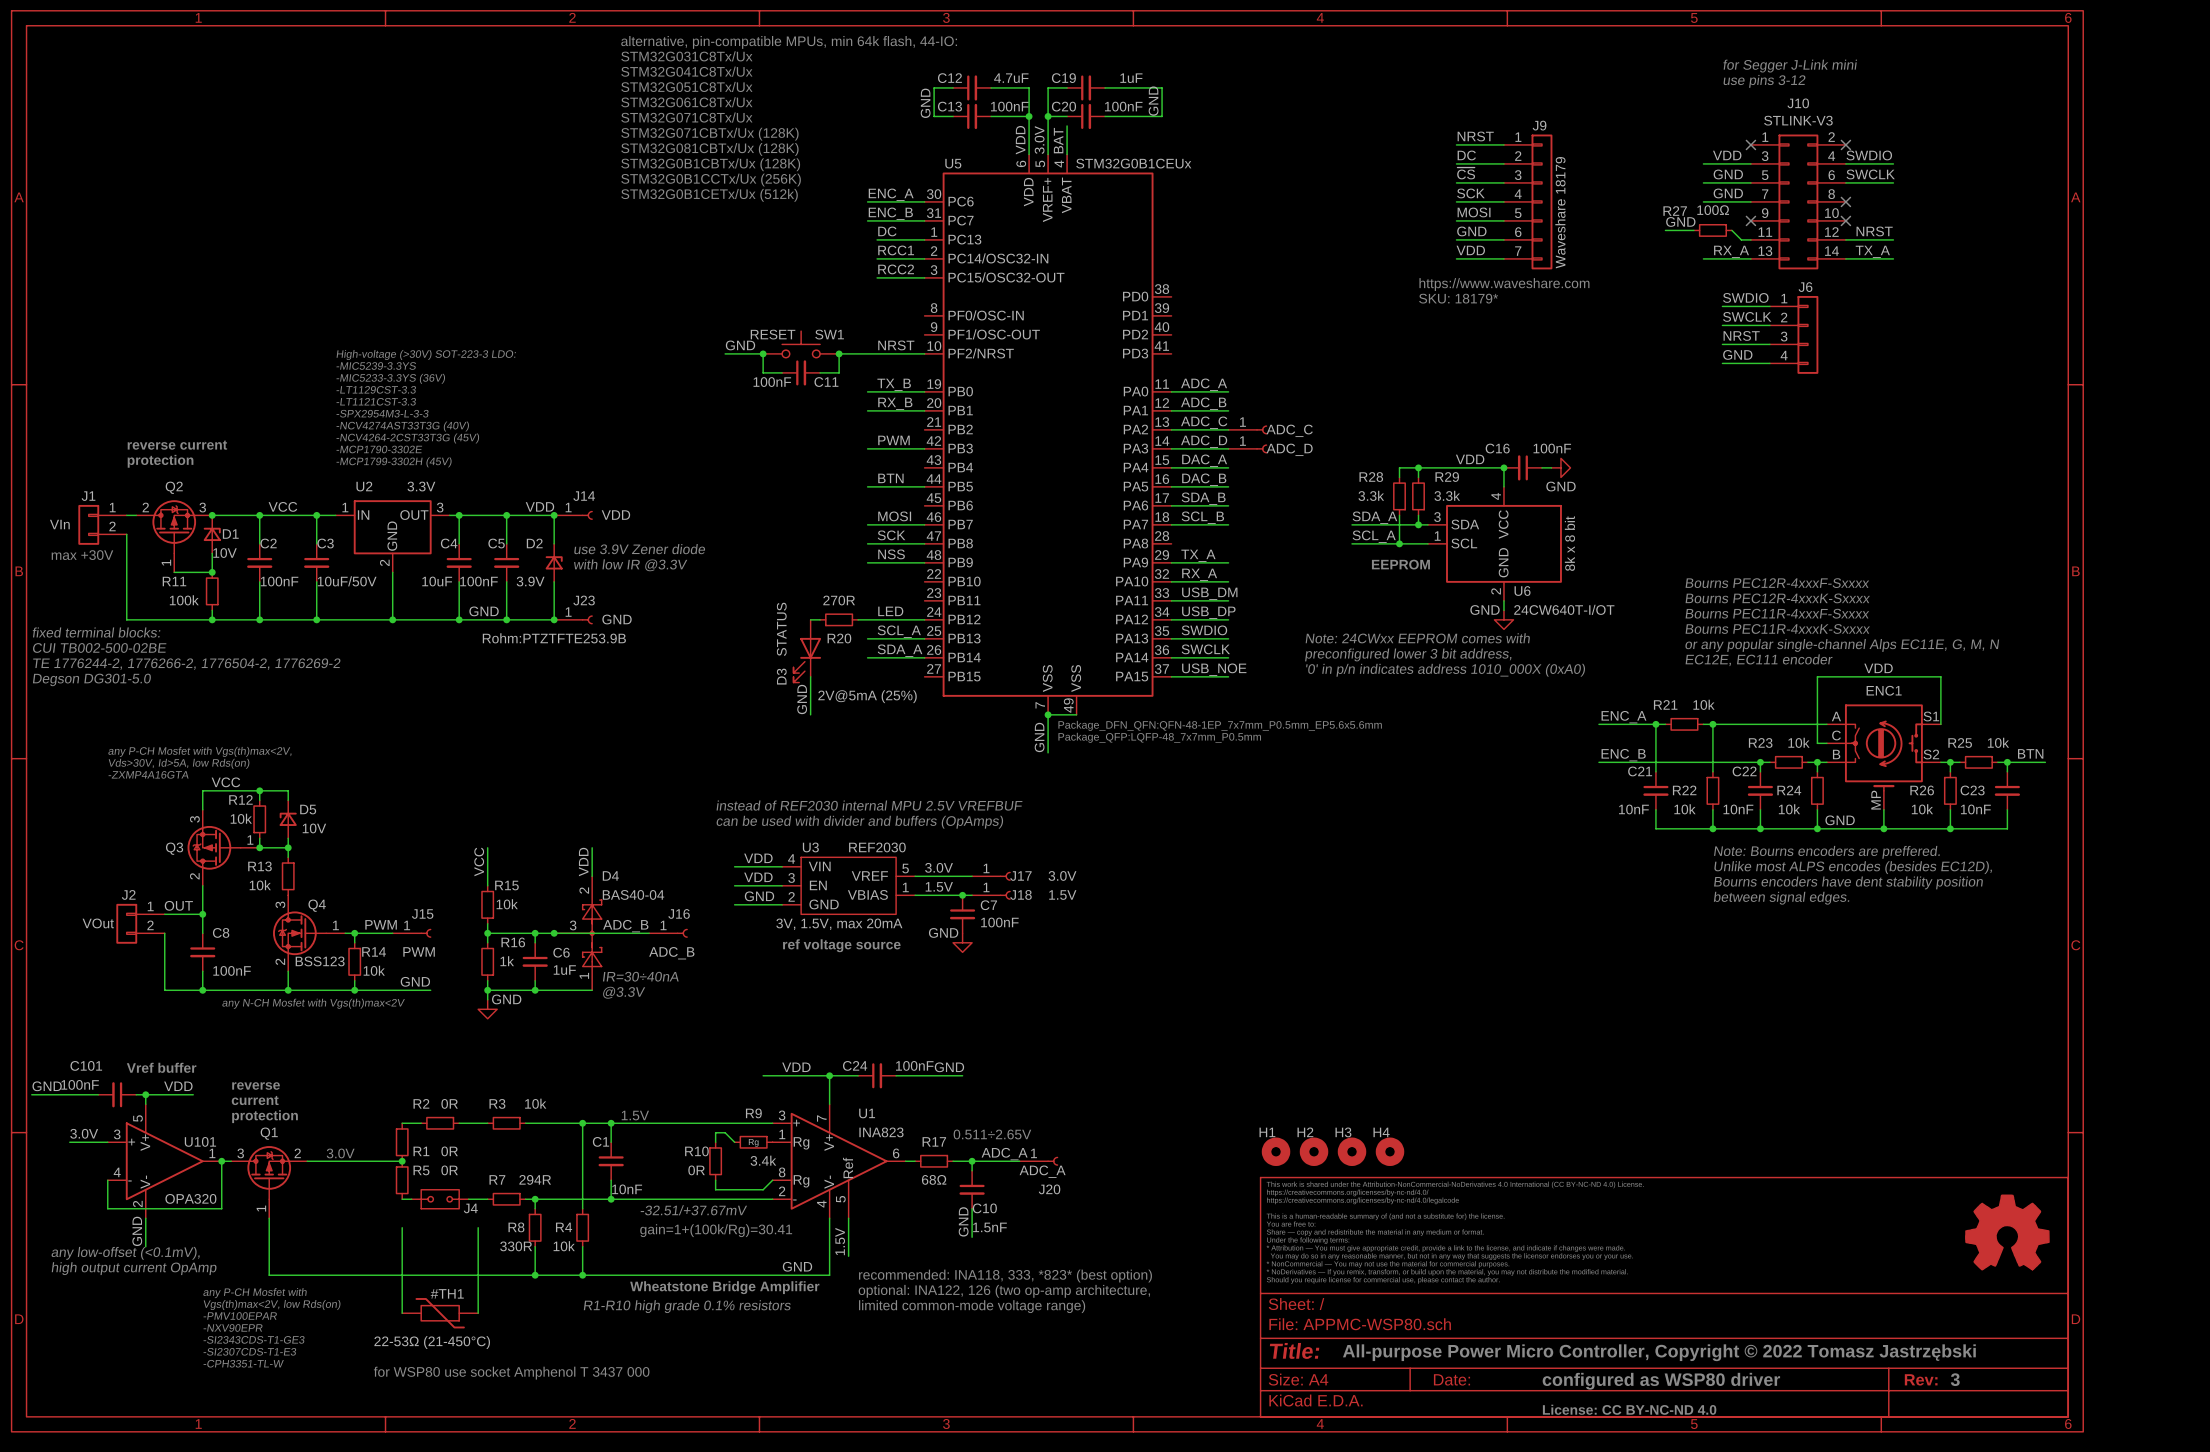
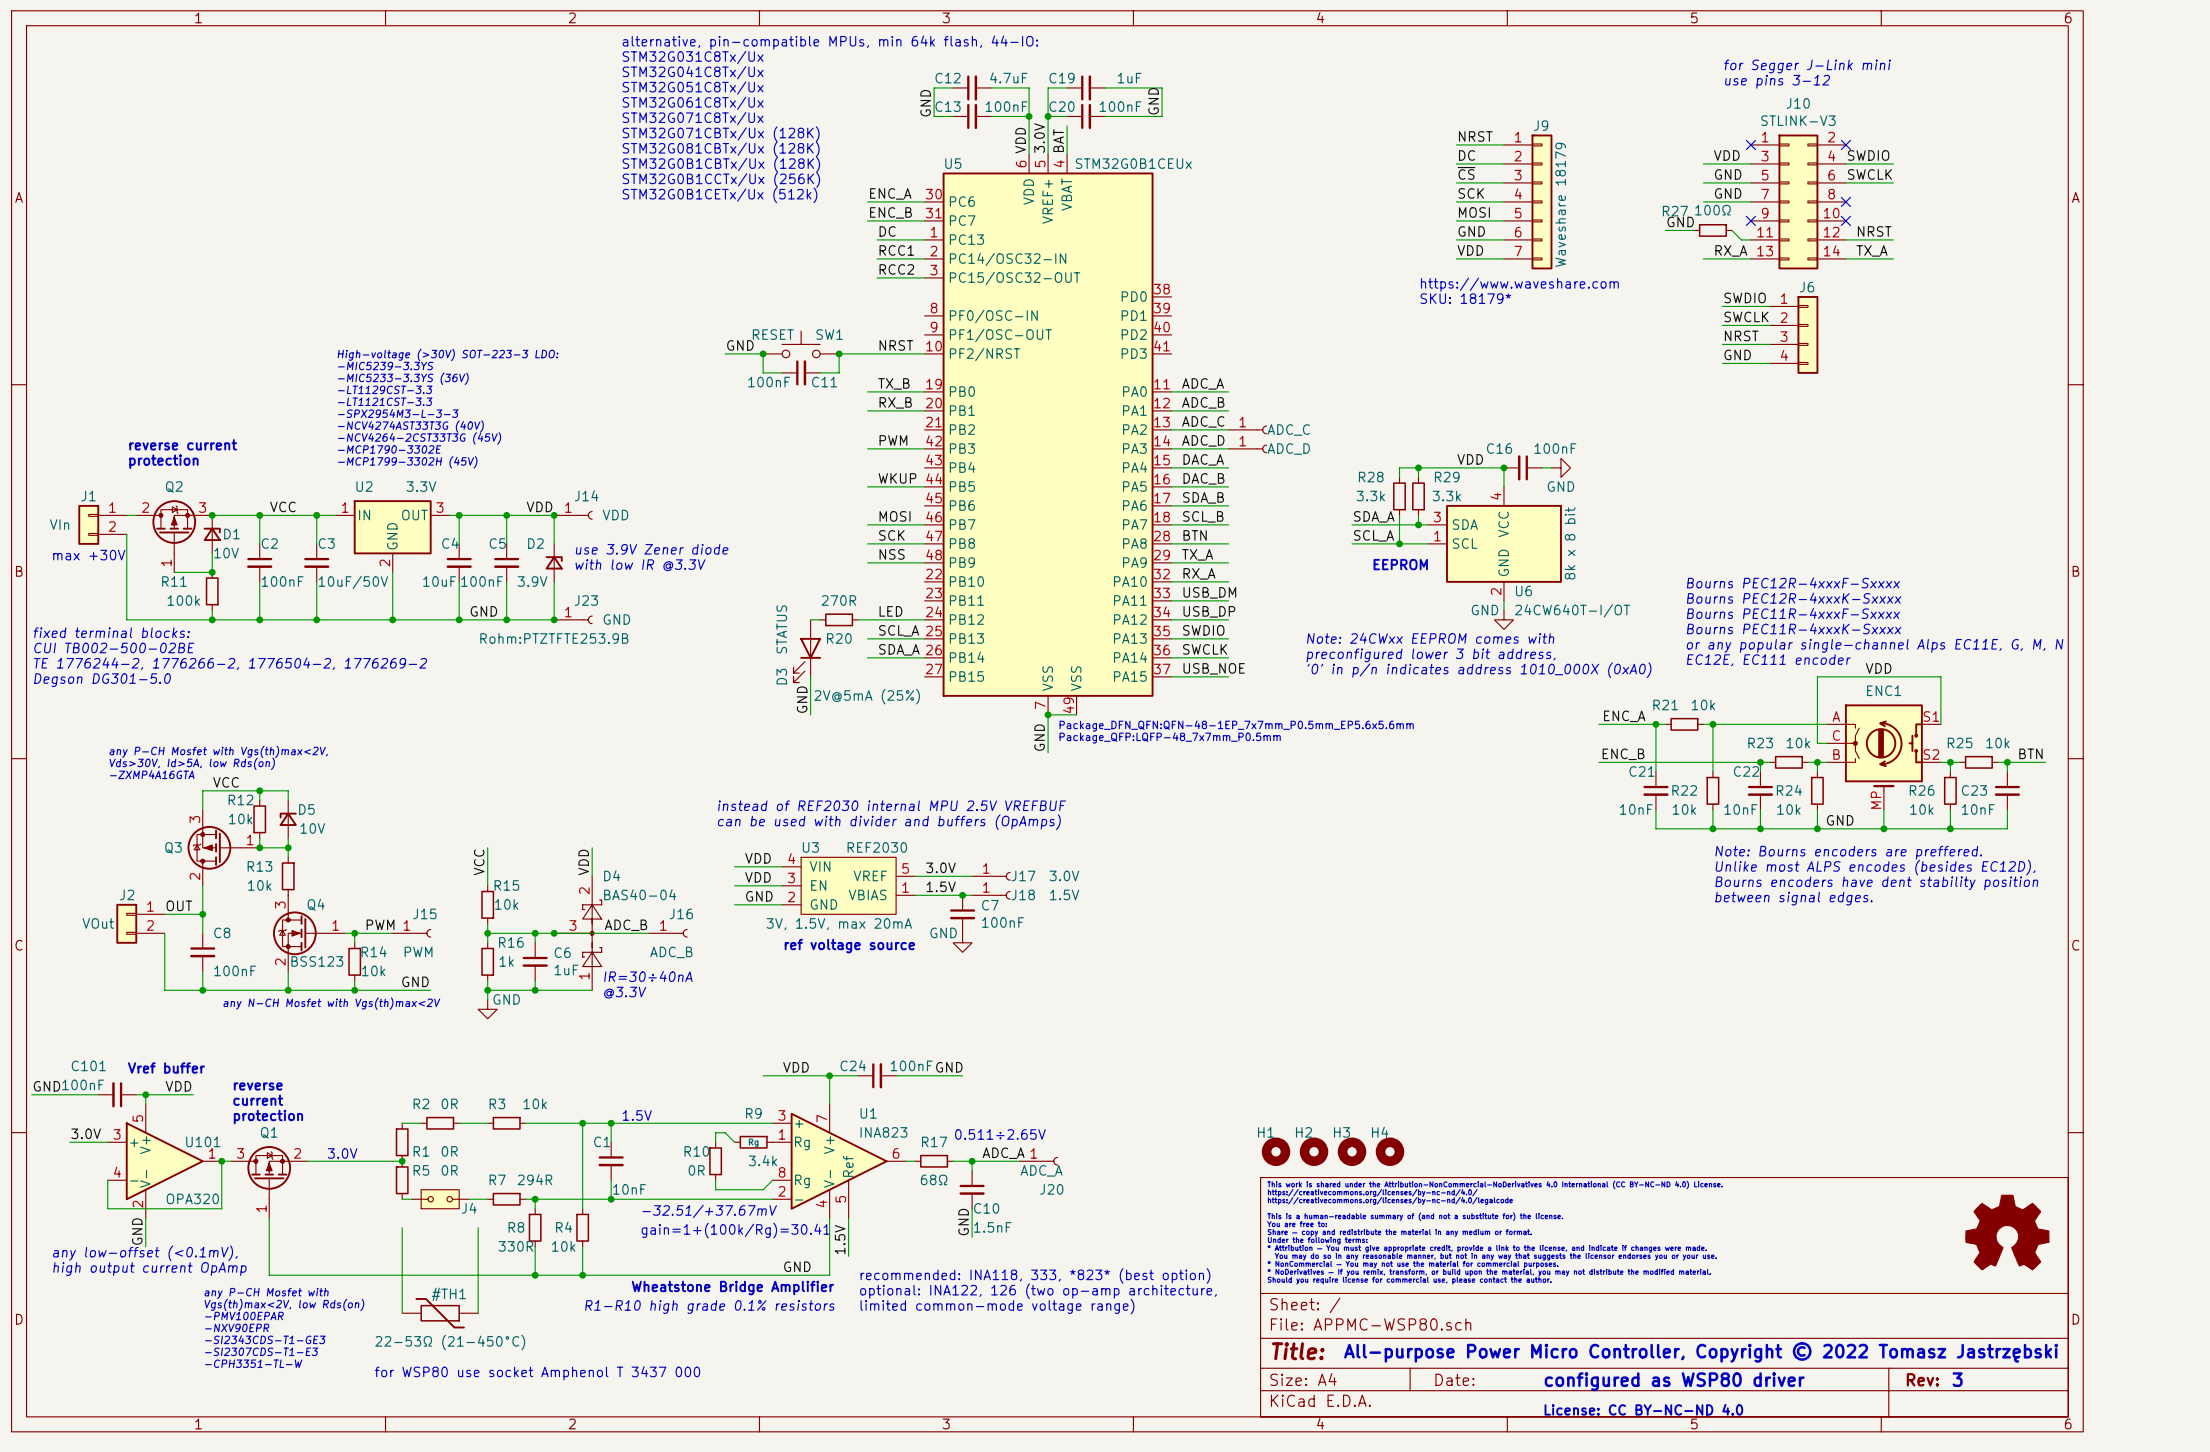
label: BTN (890, 478) -> WKUP (897, 478)
label: none -> BTN (1195, 535)
wire: none -> (1171, 543) (1228, 543)

